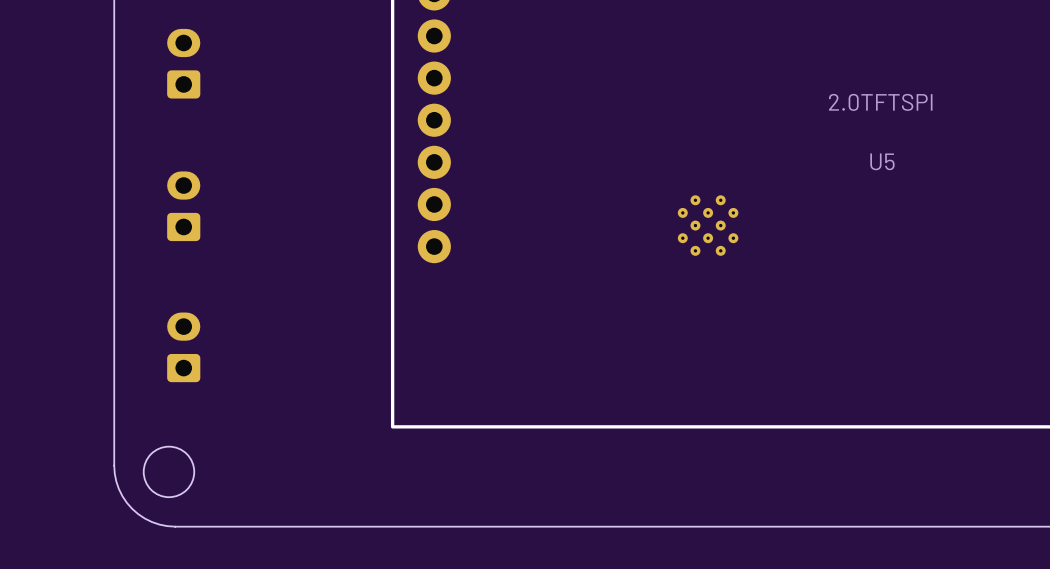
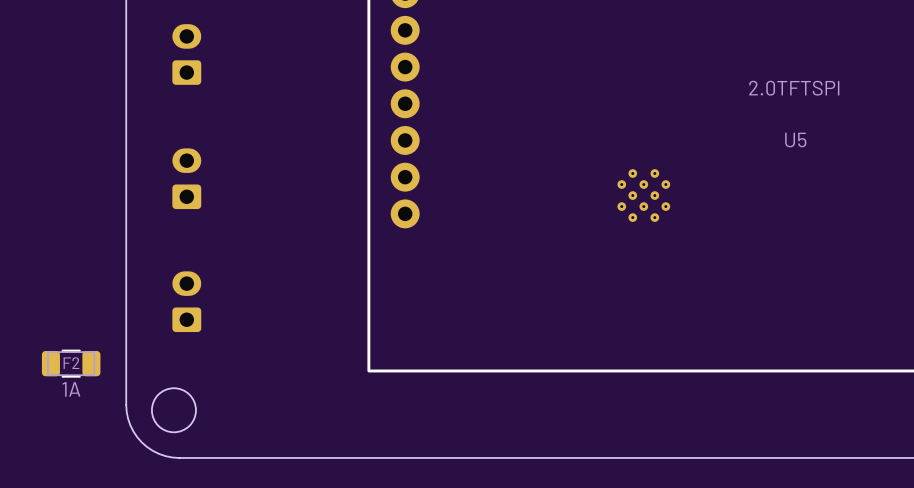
F2: none -> 1A (71, 363)

